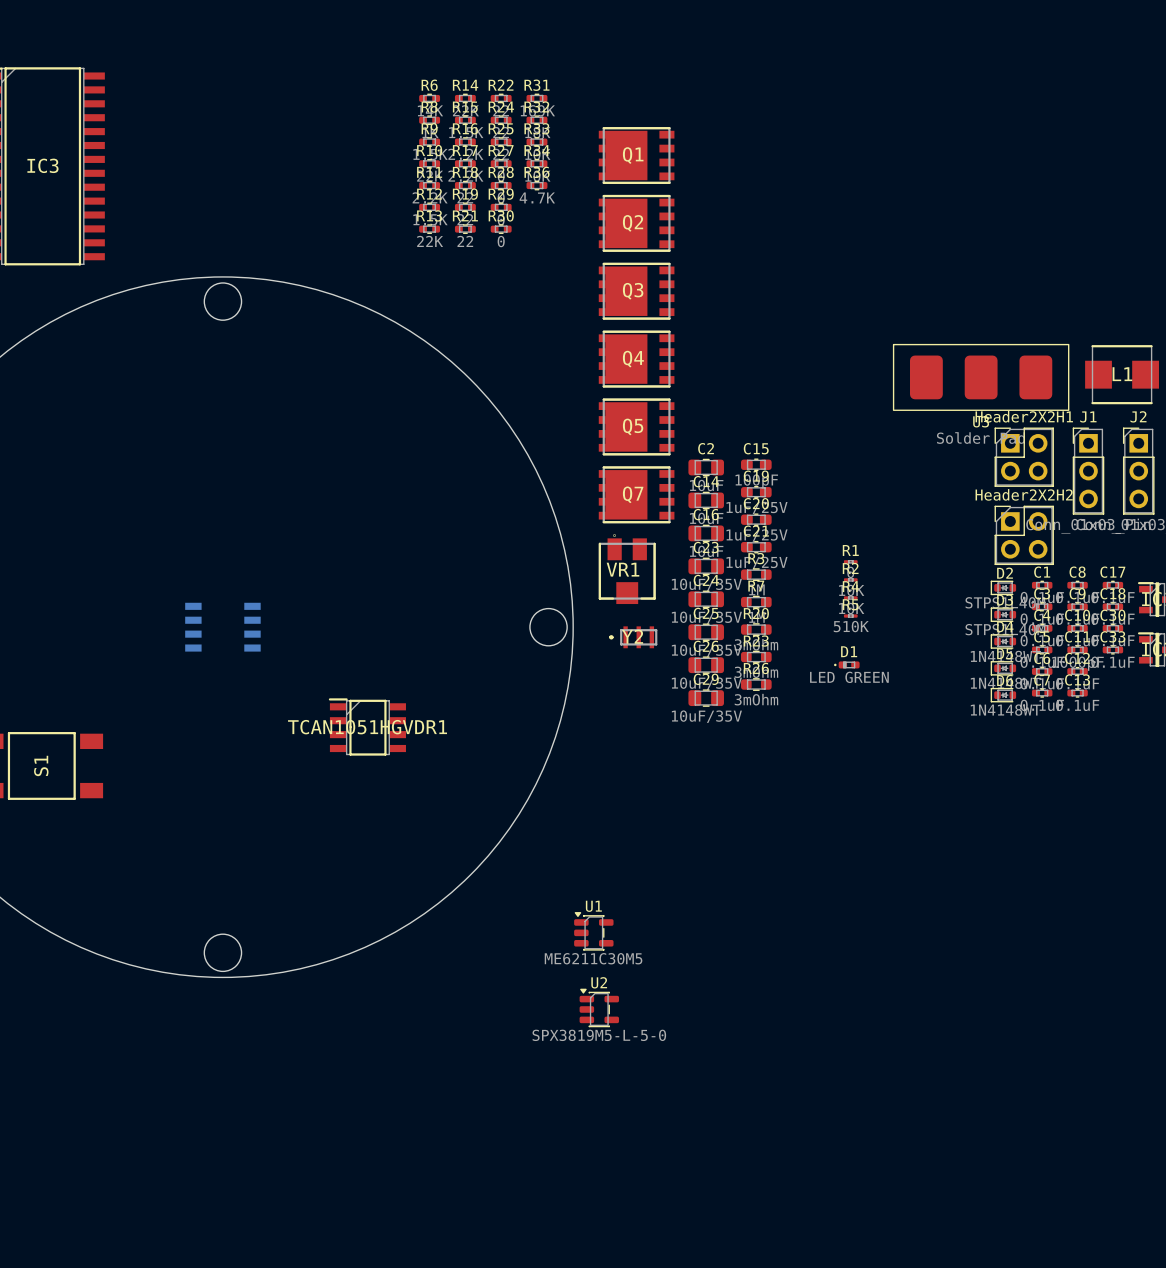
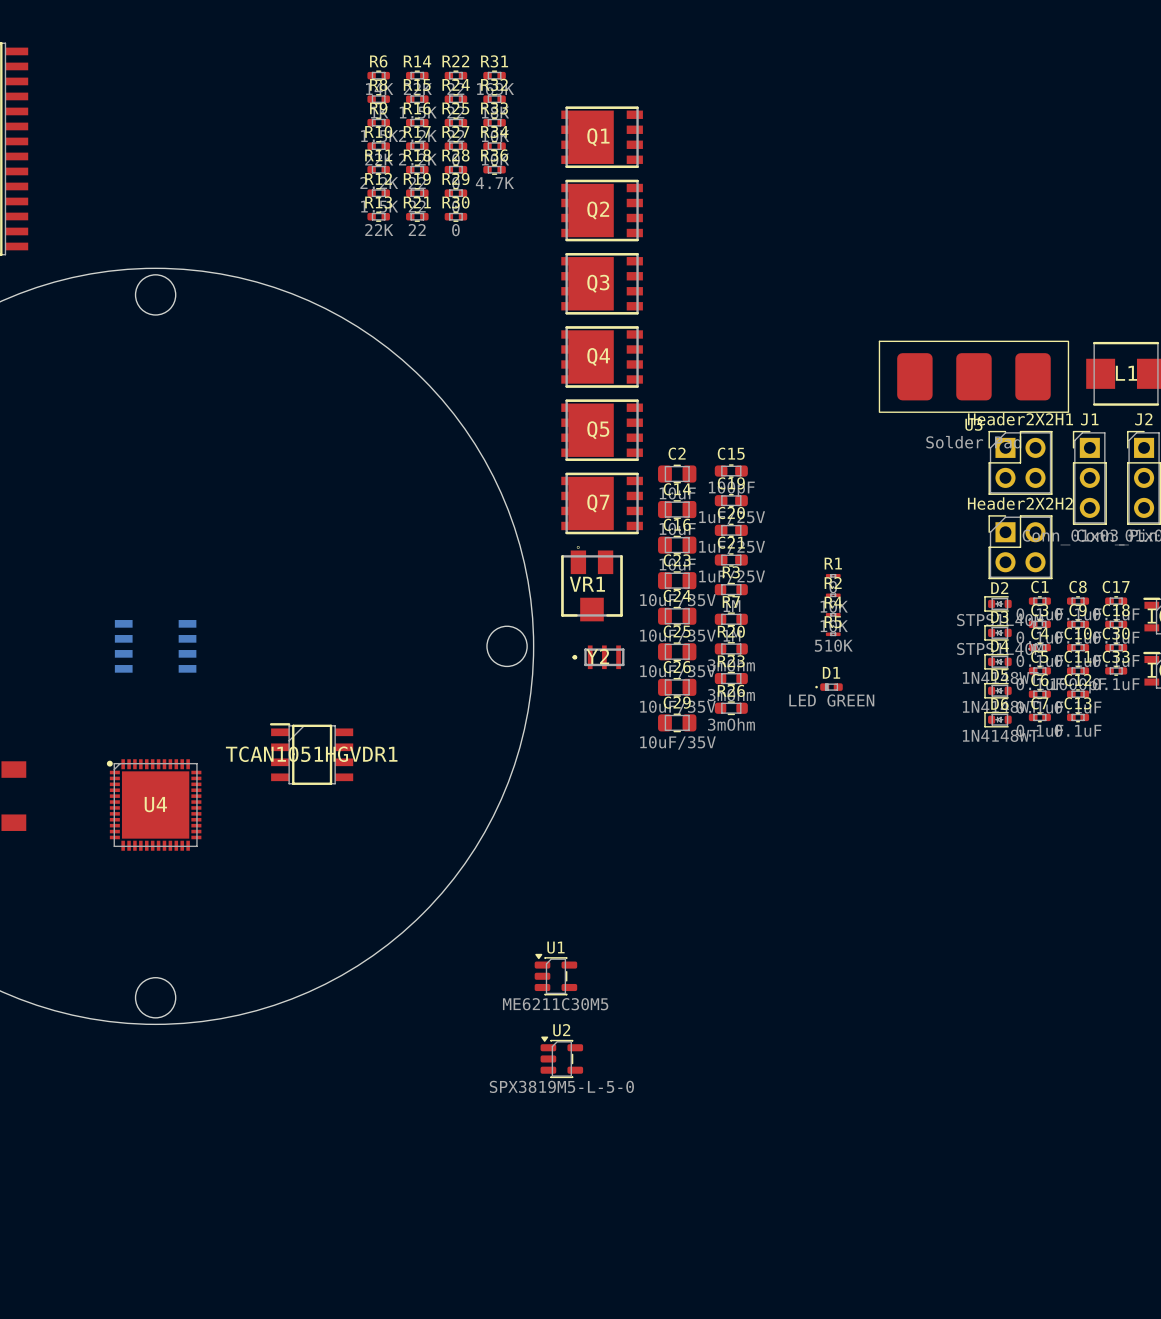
U4: none -> (154, 804)

